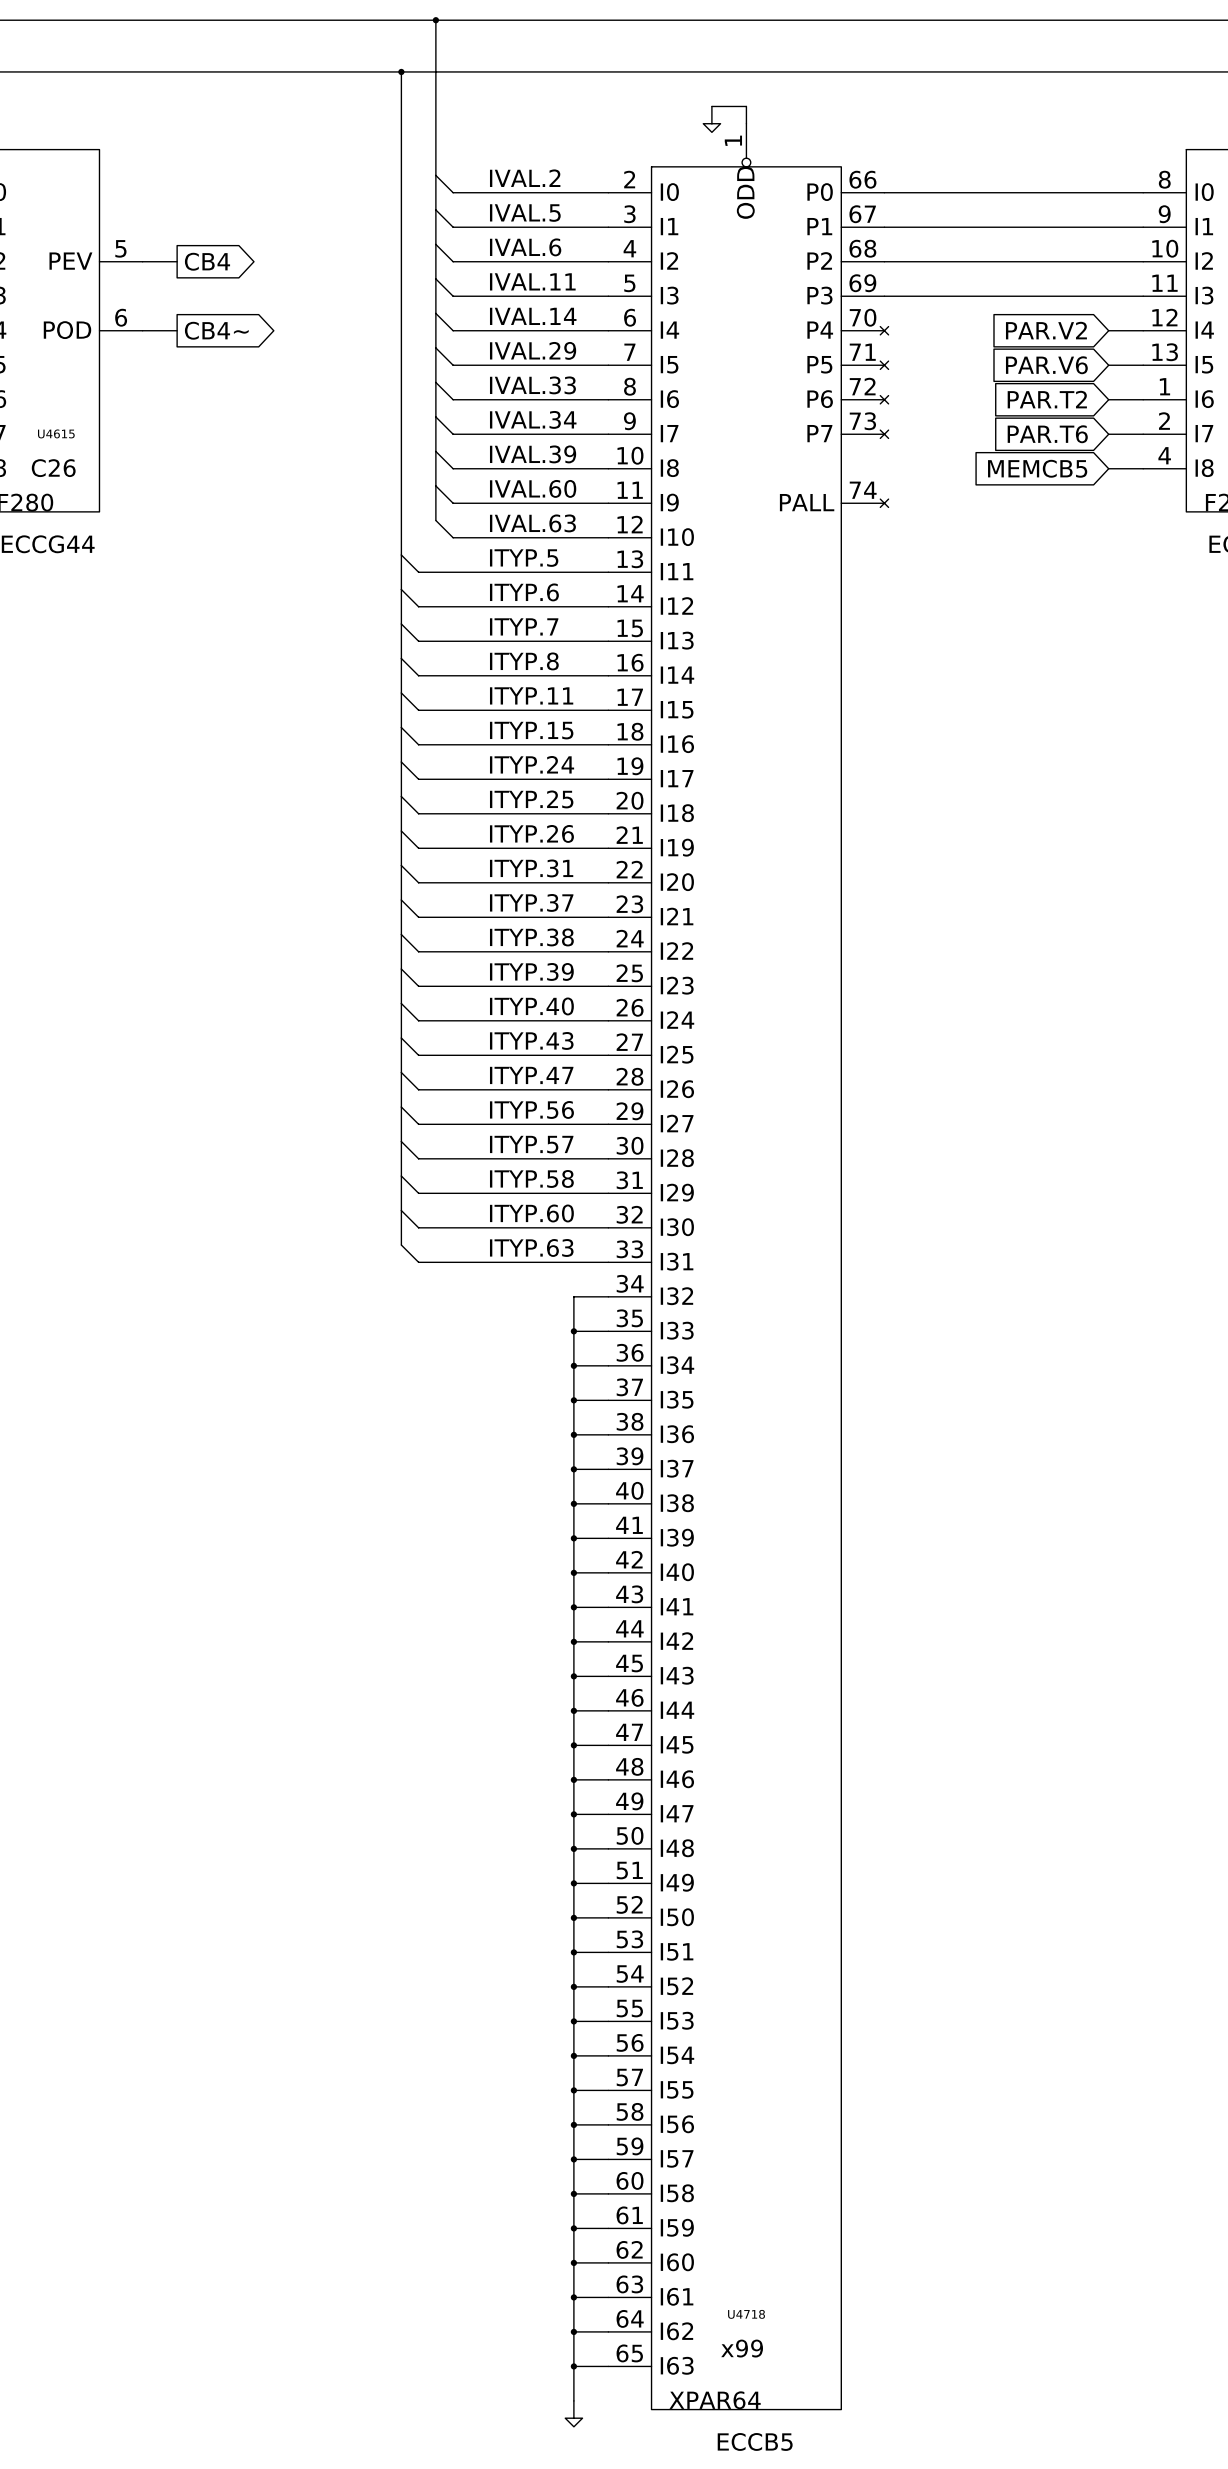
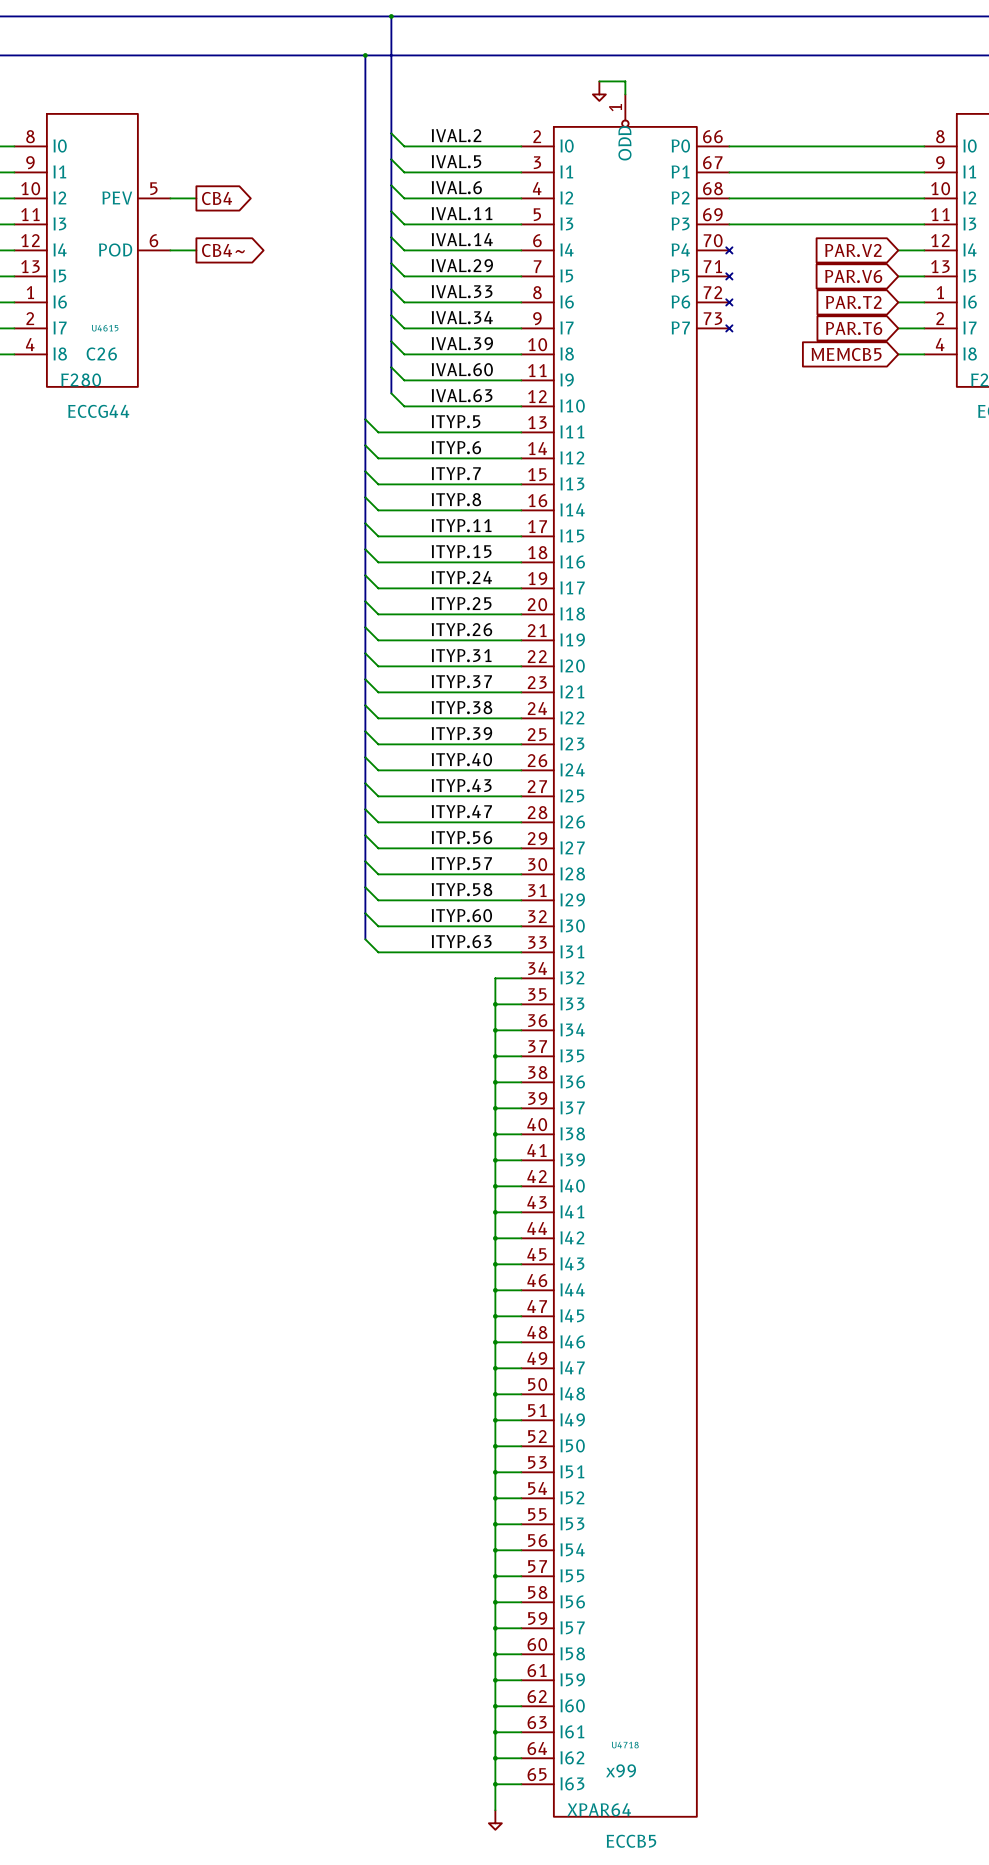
U4718 symbol: [608, 123, 885, 2410] -> [521, 94, 730, 1817]
no-connect mark: (884, 503) -> none

